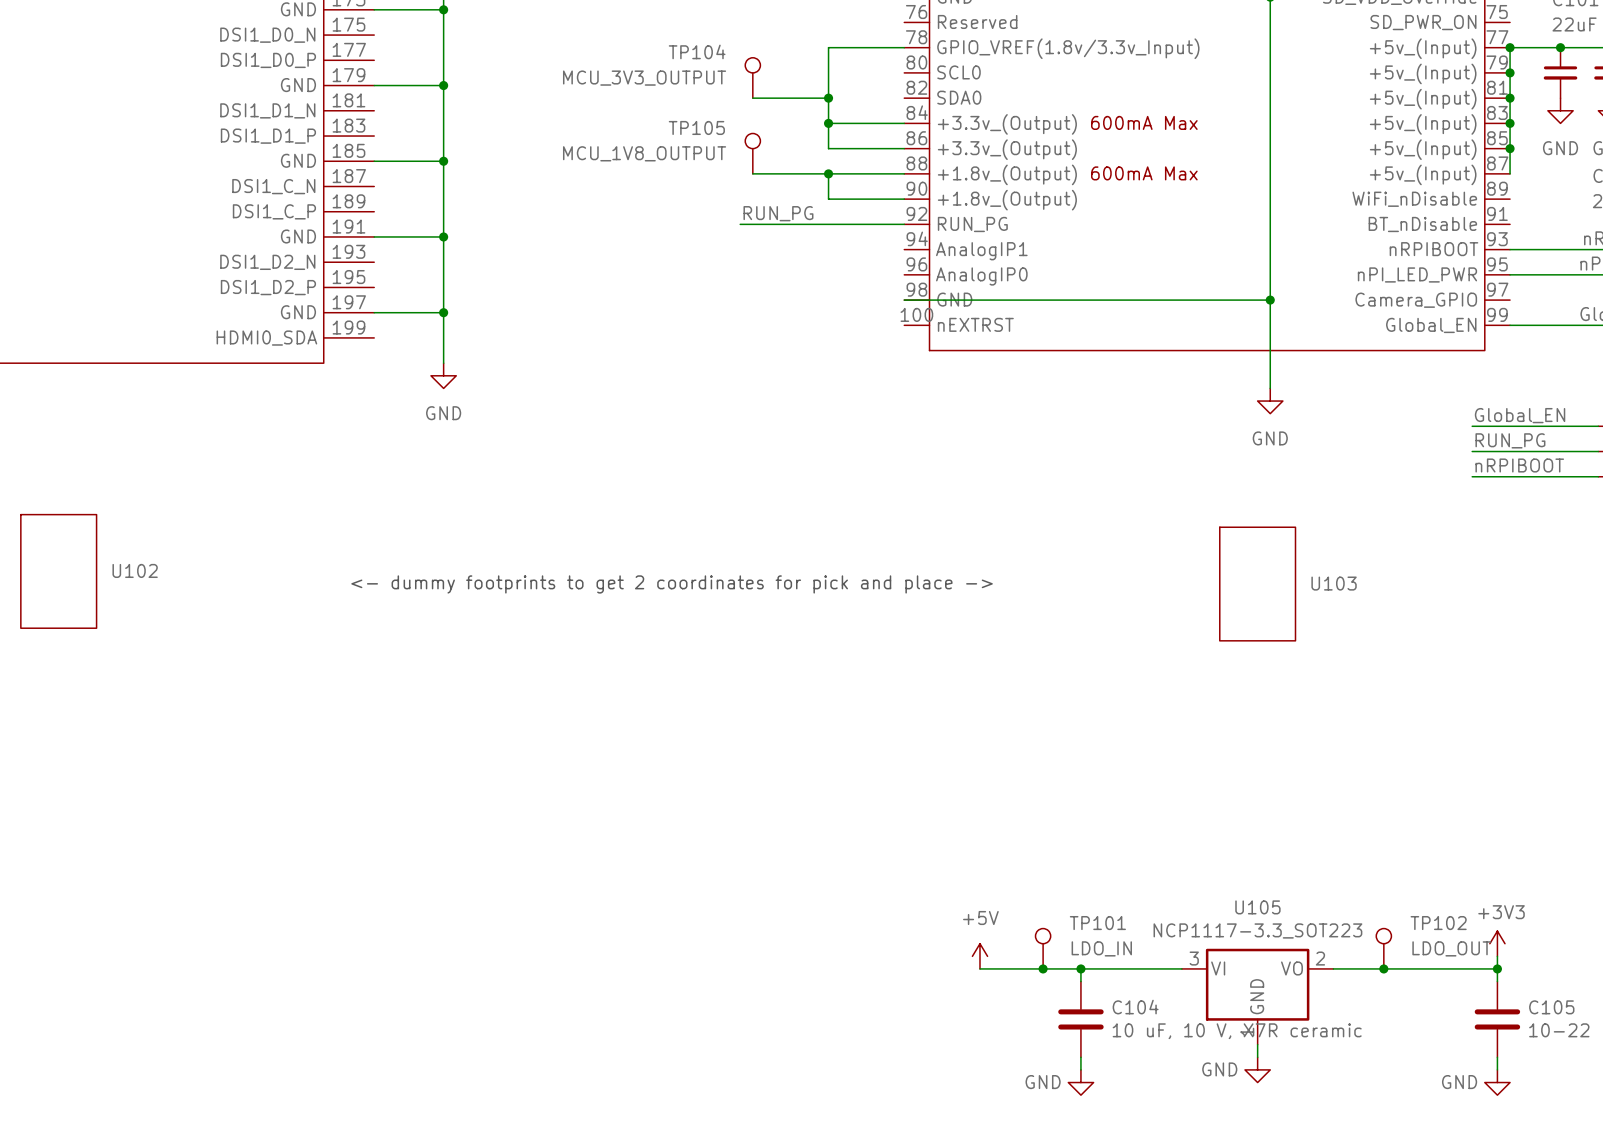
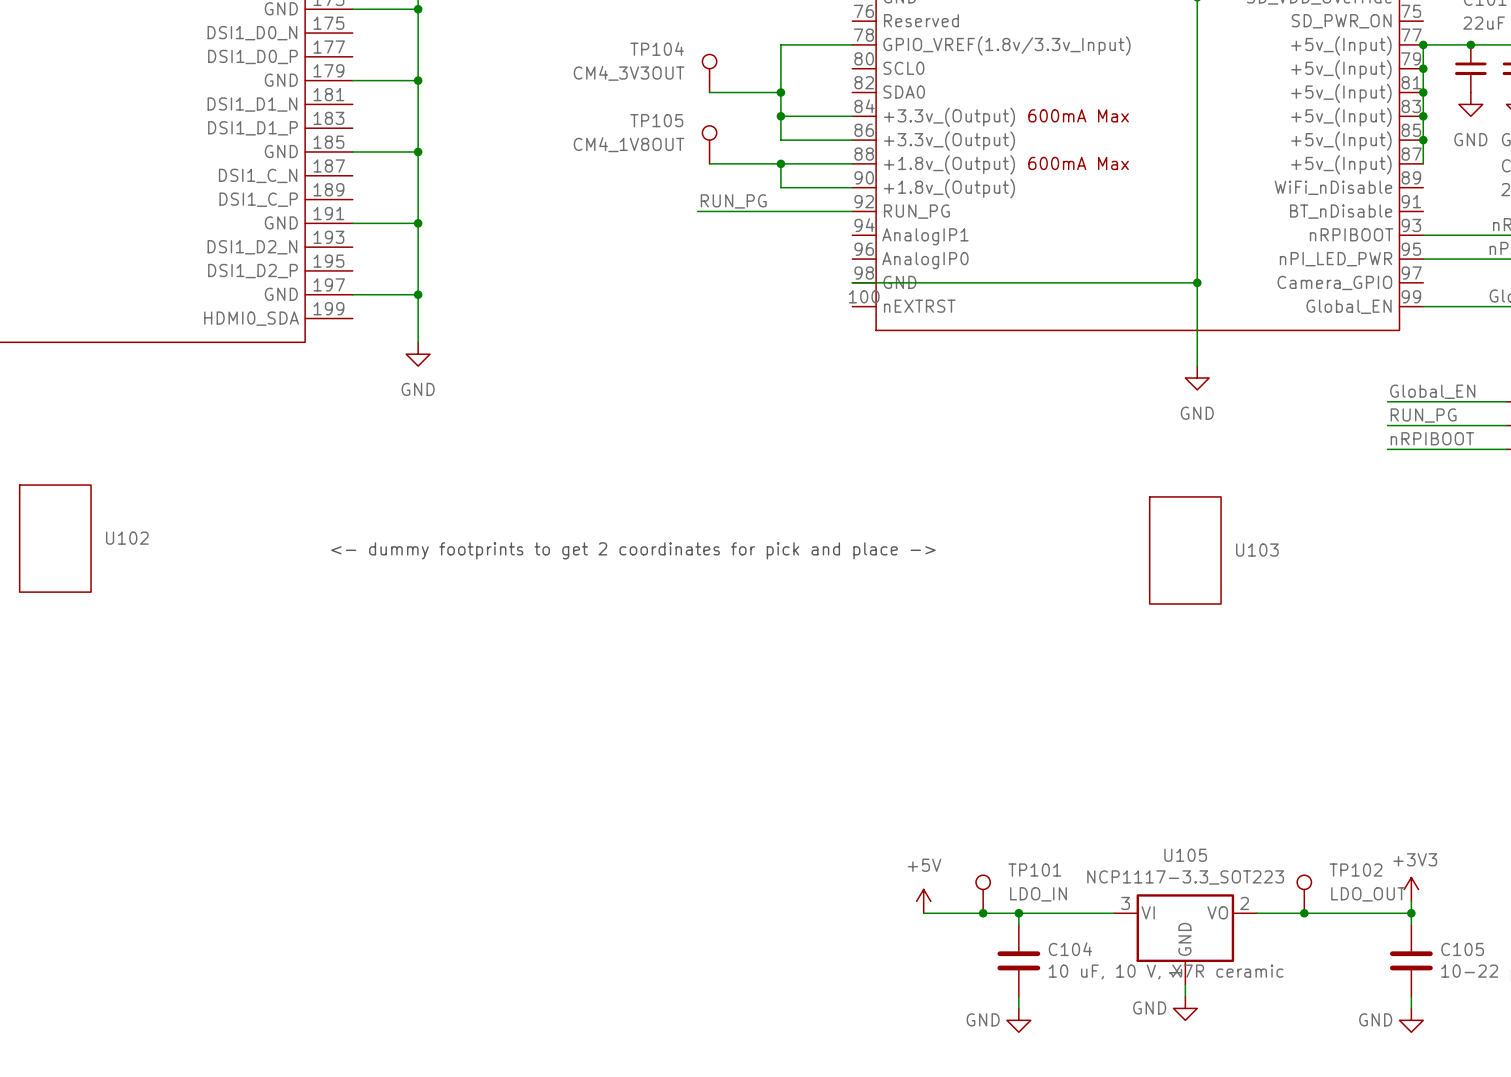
TP104 value: MCU_3V3_OUTPUT (644, 78) -> CM4_3V3OUT (629, 73)
TP105 value: MCU_1V8_OUTPUT (644, 153) -> CM4_1V8OUT (629, 144)

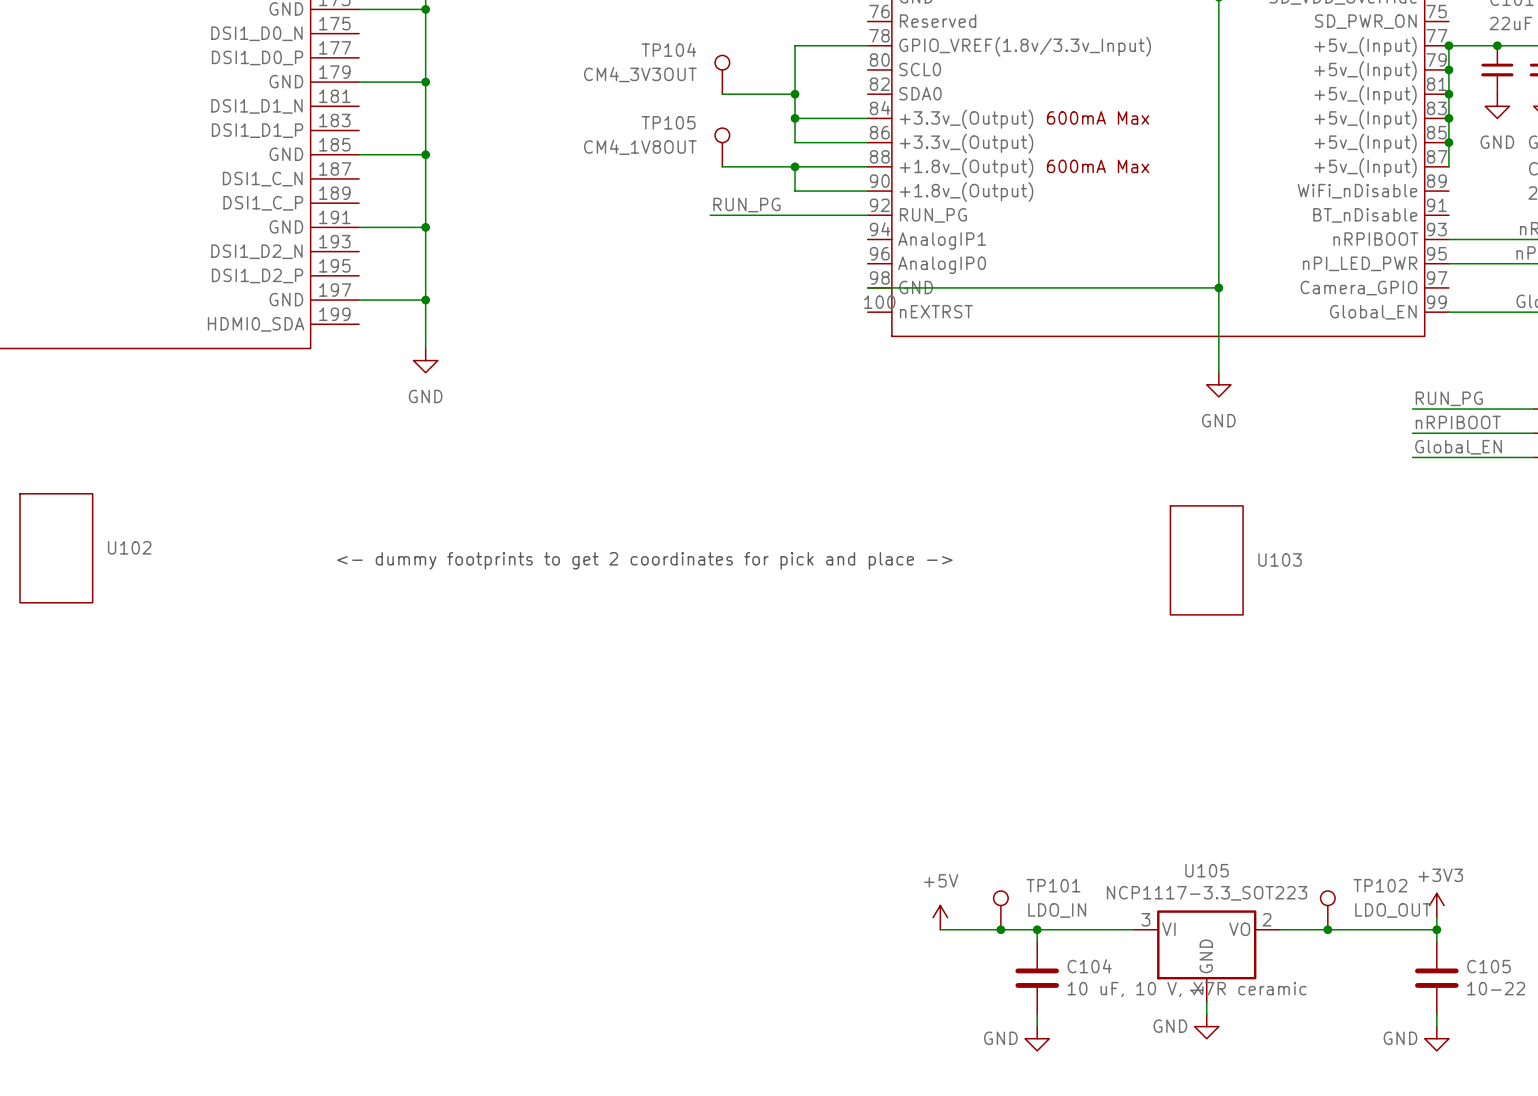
label: Global_EN (1432, 391) -> RUN_PG (1449, 398)
label: RUN_PG (1423, 415) -> nRPIBOOT (1458, 422)
label: nRPIBOOT (1432, 438) -> Global_EN (1458, 447)

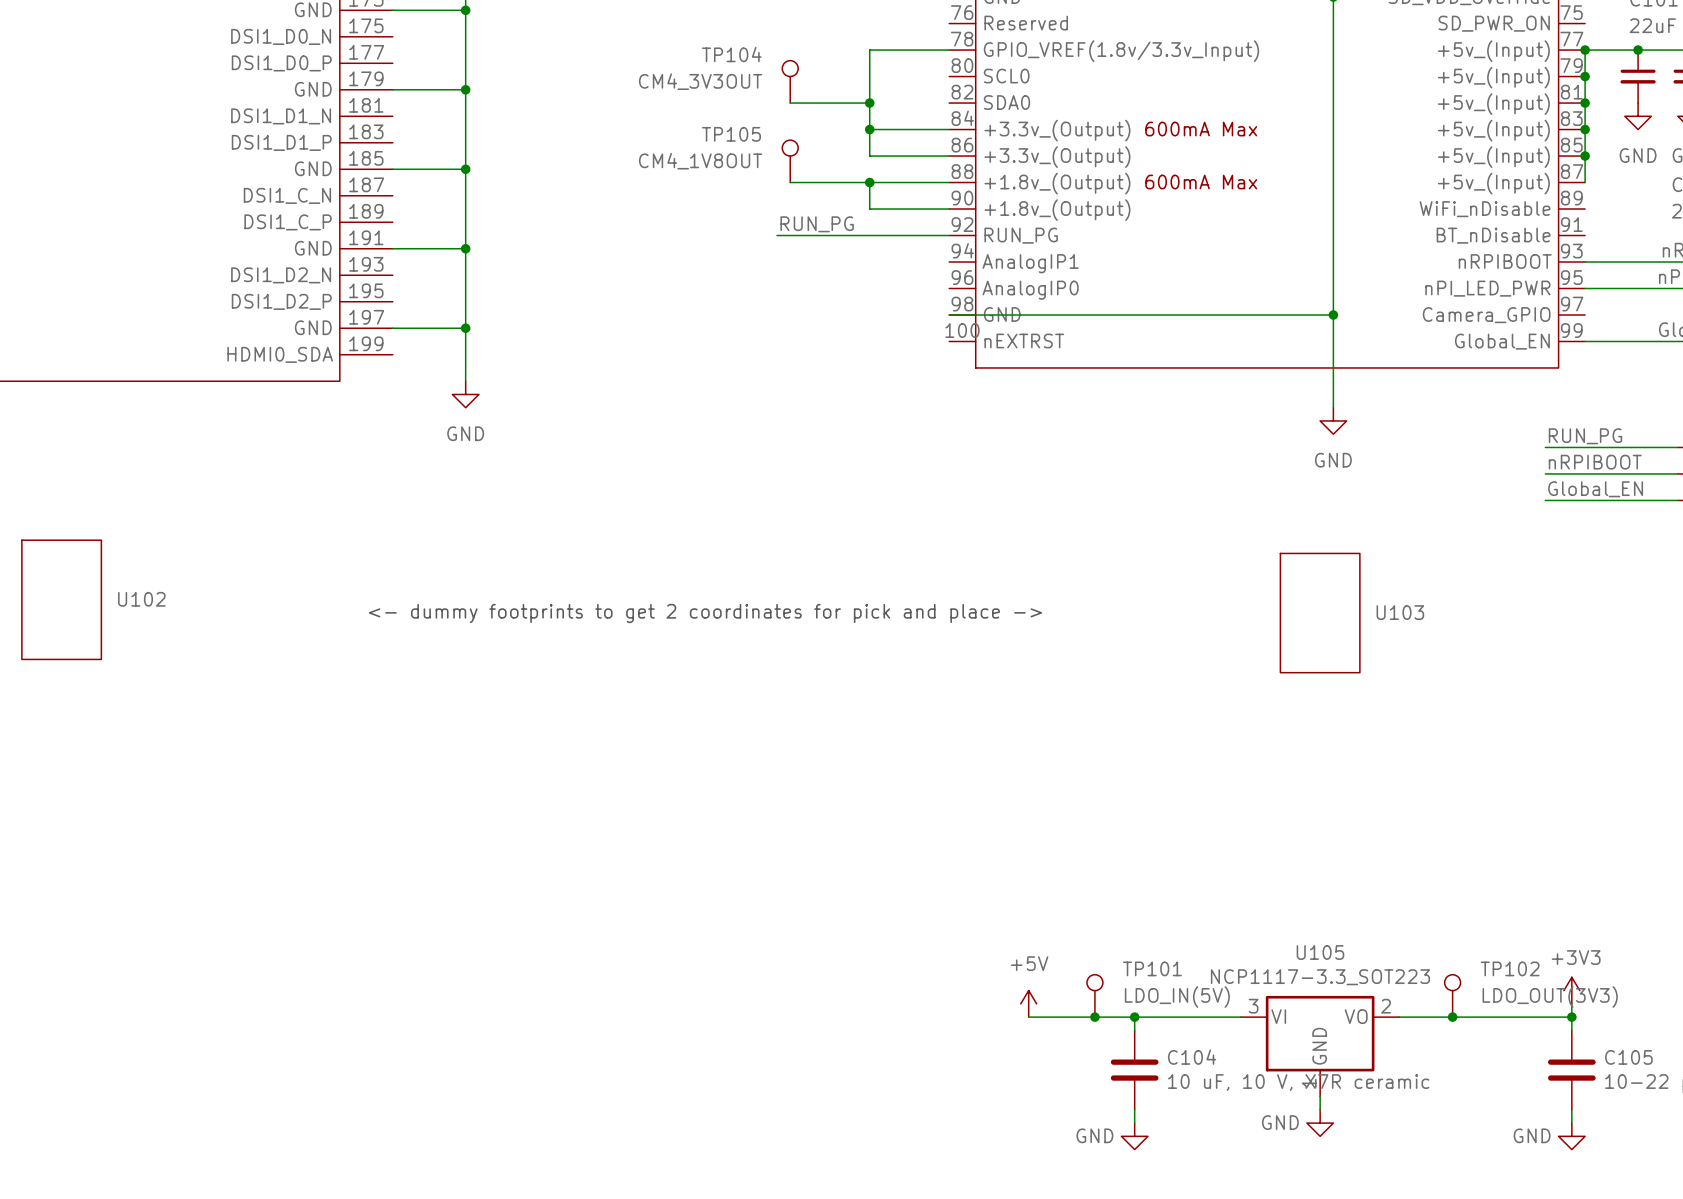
TP101 value: LDO_IN (1057, 910) -> LDO_IN(5V) (1177, 996)
TP102 value: LDO_OUT (1393, 910) -> LDO_OUT(3V3) (1550, 996)

